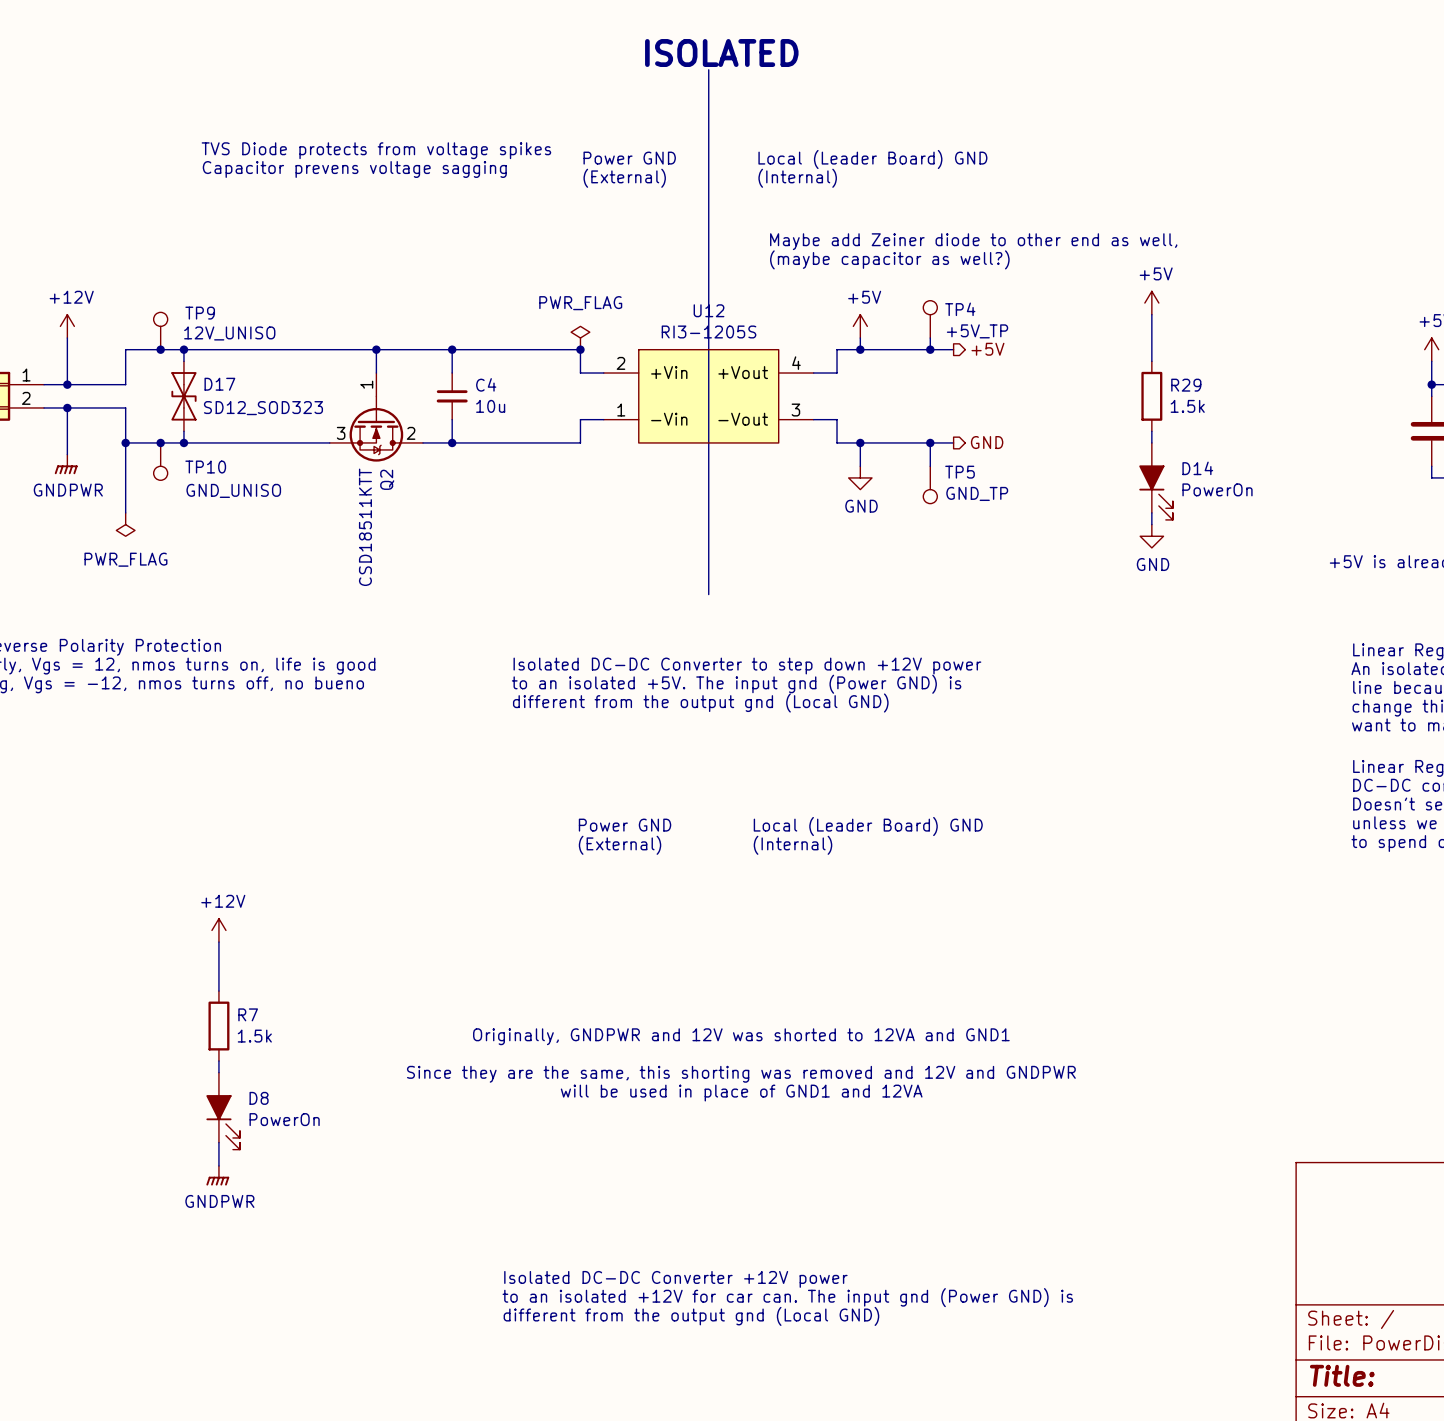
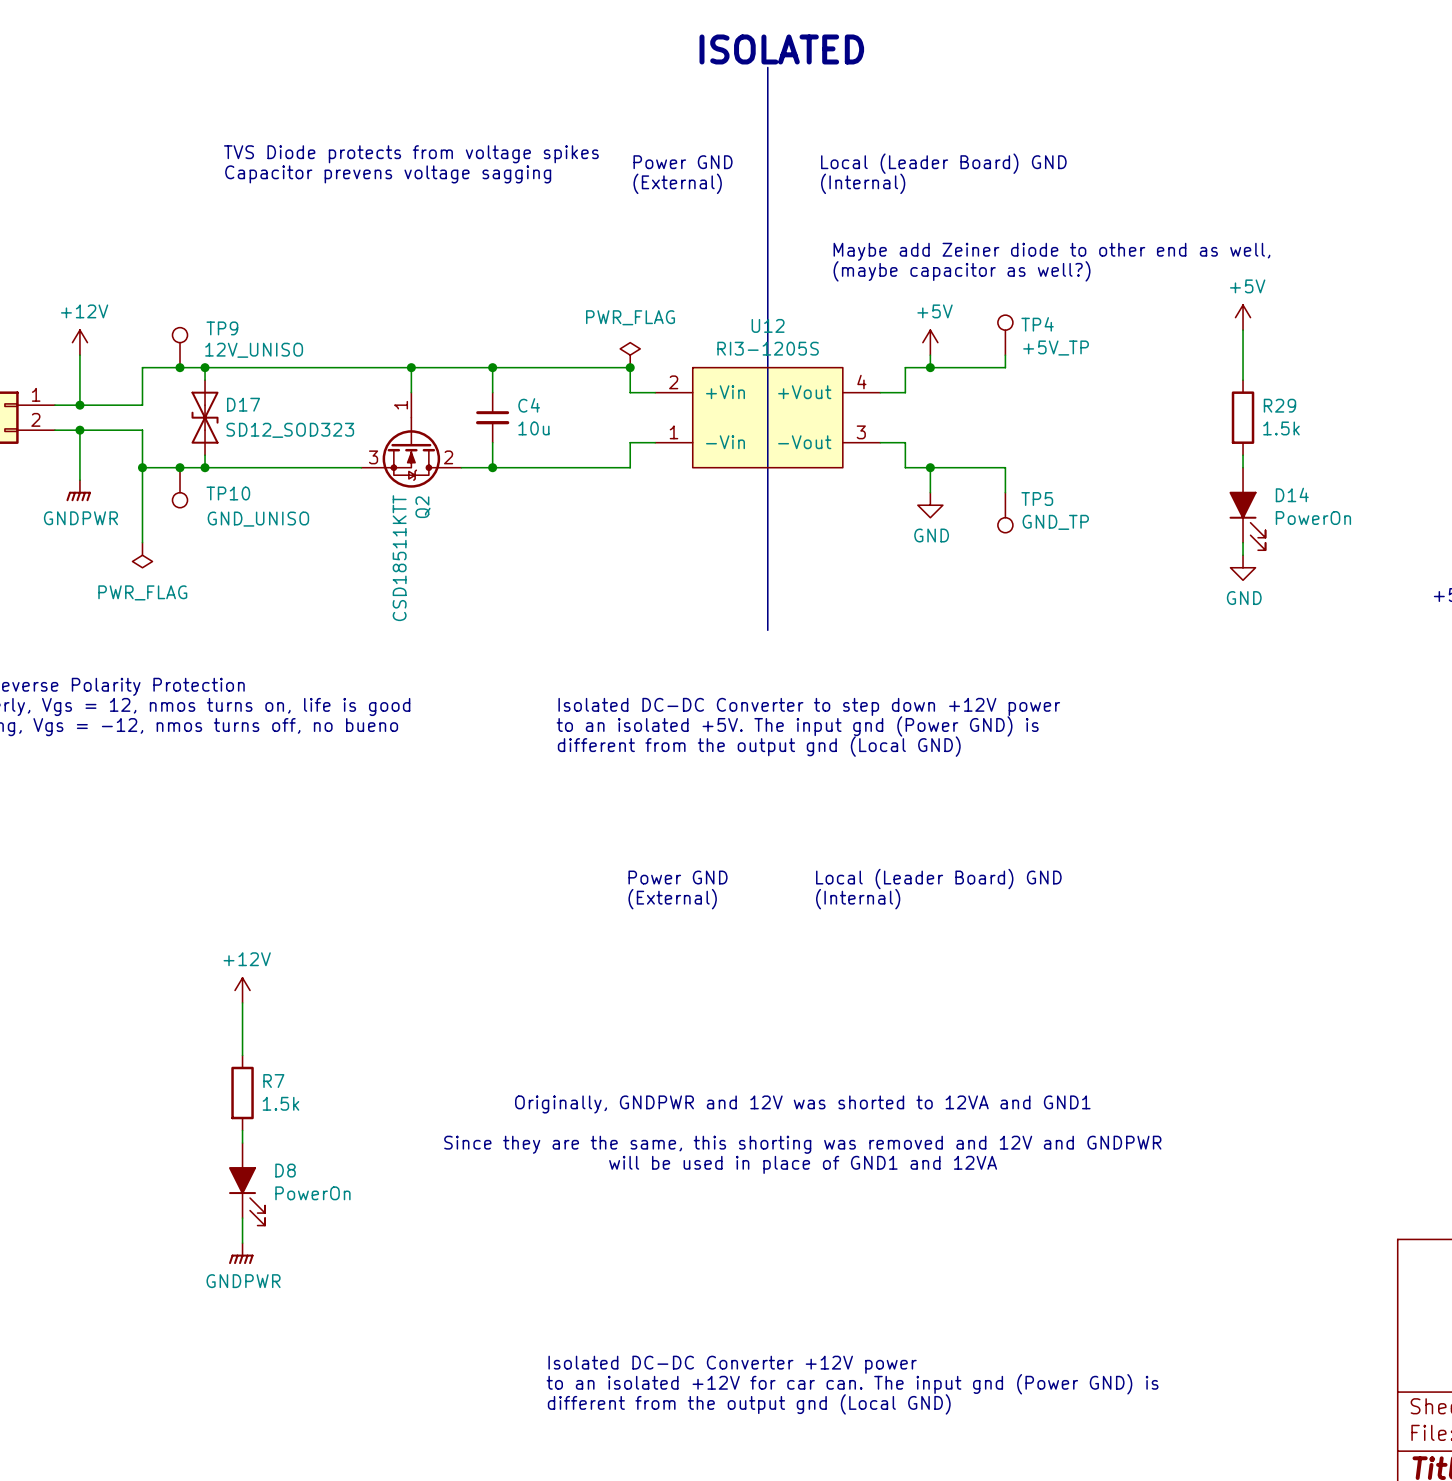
wire: (930, 349) (953, 349) -> none
junction: (930, 349) -> none
hierarchical label: +5V (987, 349) -> none
wire: (930, 442) (953, 442) -> none
junction: (930, 442) -> none
hierarchical label: GND (987, 442) -> none

